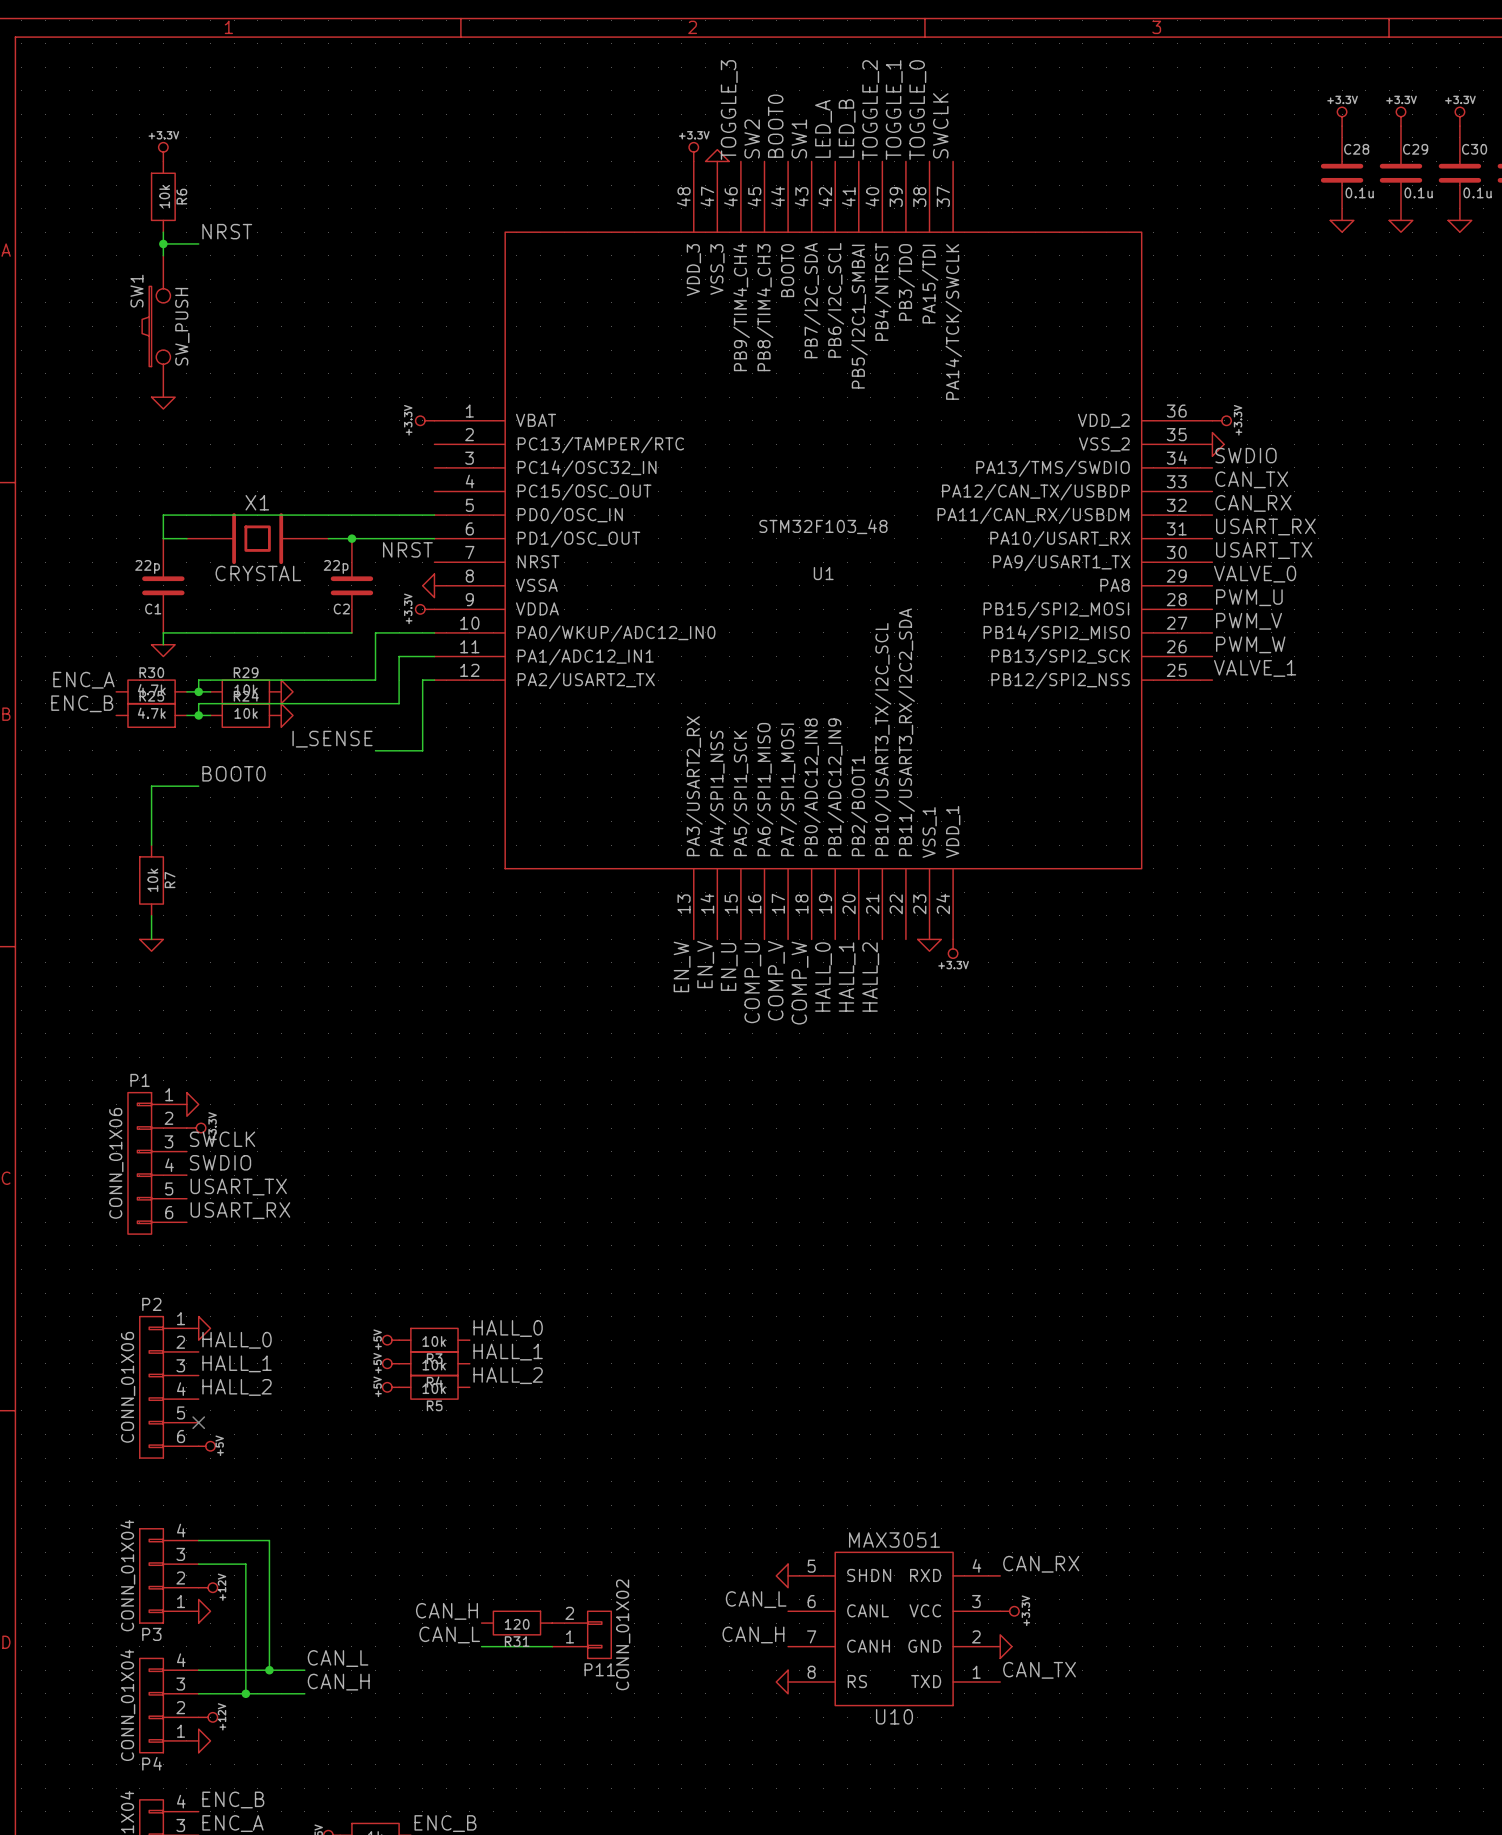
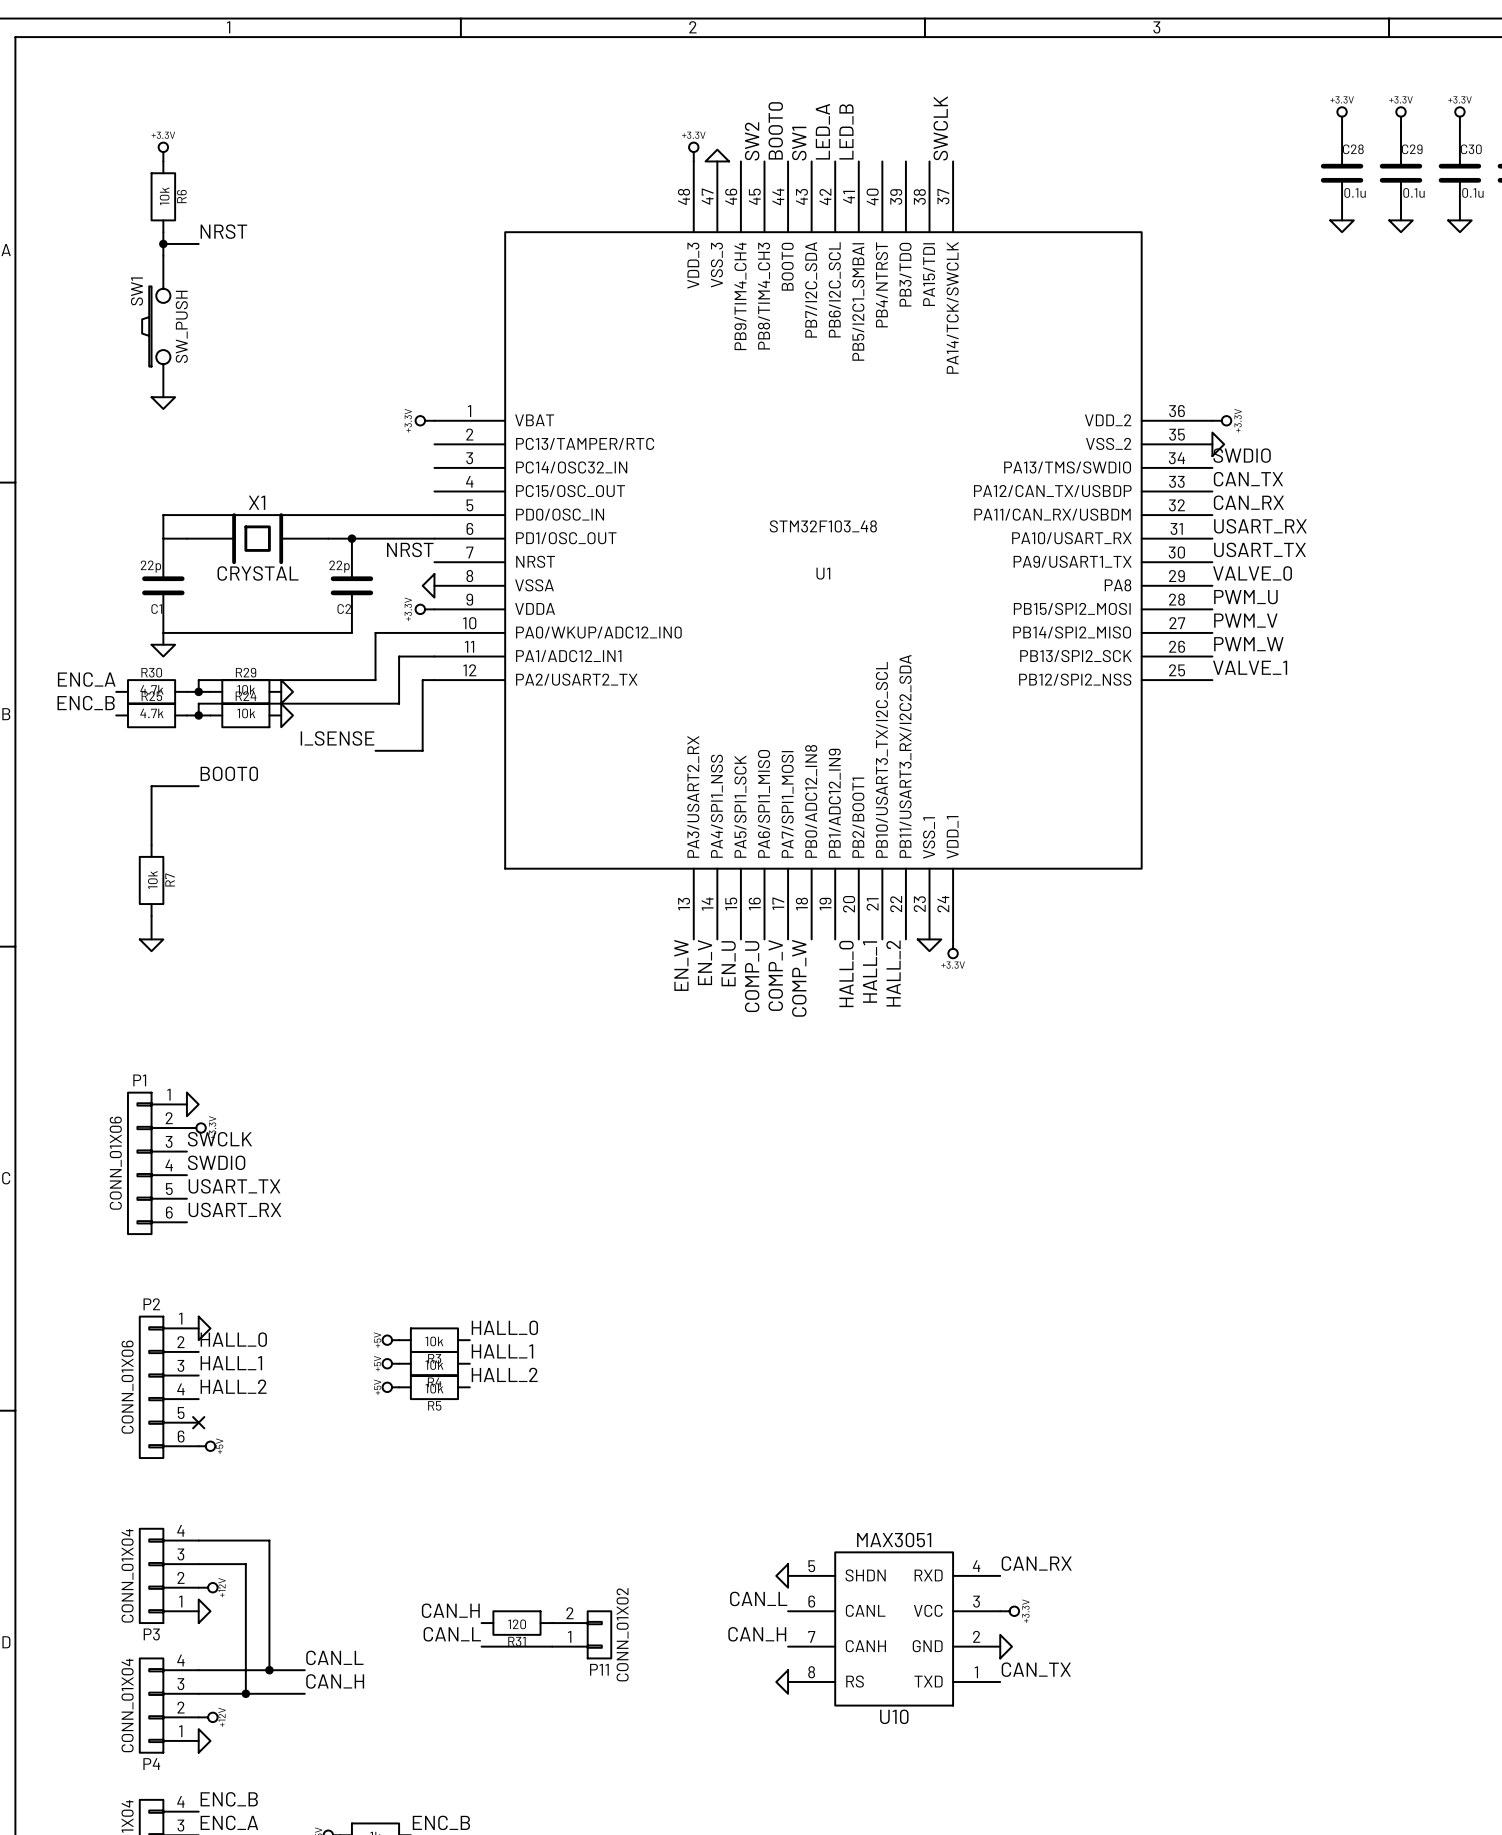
label: TOGGLE_3 (729, 110) -> none
label: TOGGLE_2 (870, 110) -> none
label: TOGGLE_1 (894, 110) -> none
label: TOGGLE_0 (917, 110) -> none
label: HALL_0 (823, 977) -> none
label: HALL_1 (847, 977) -> HALL_0 (846, 973)
label: HALL_2 (870, 977) -> HALL_1 (870, 972)
label: none -> HALL_2 (893, 973)

